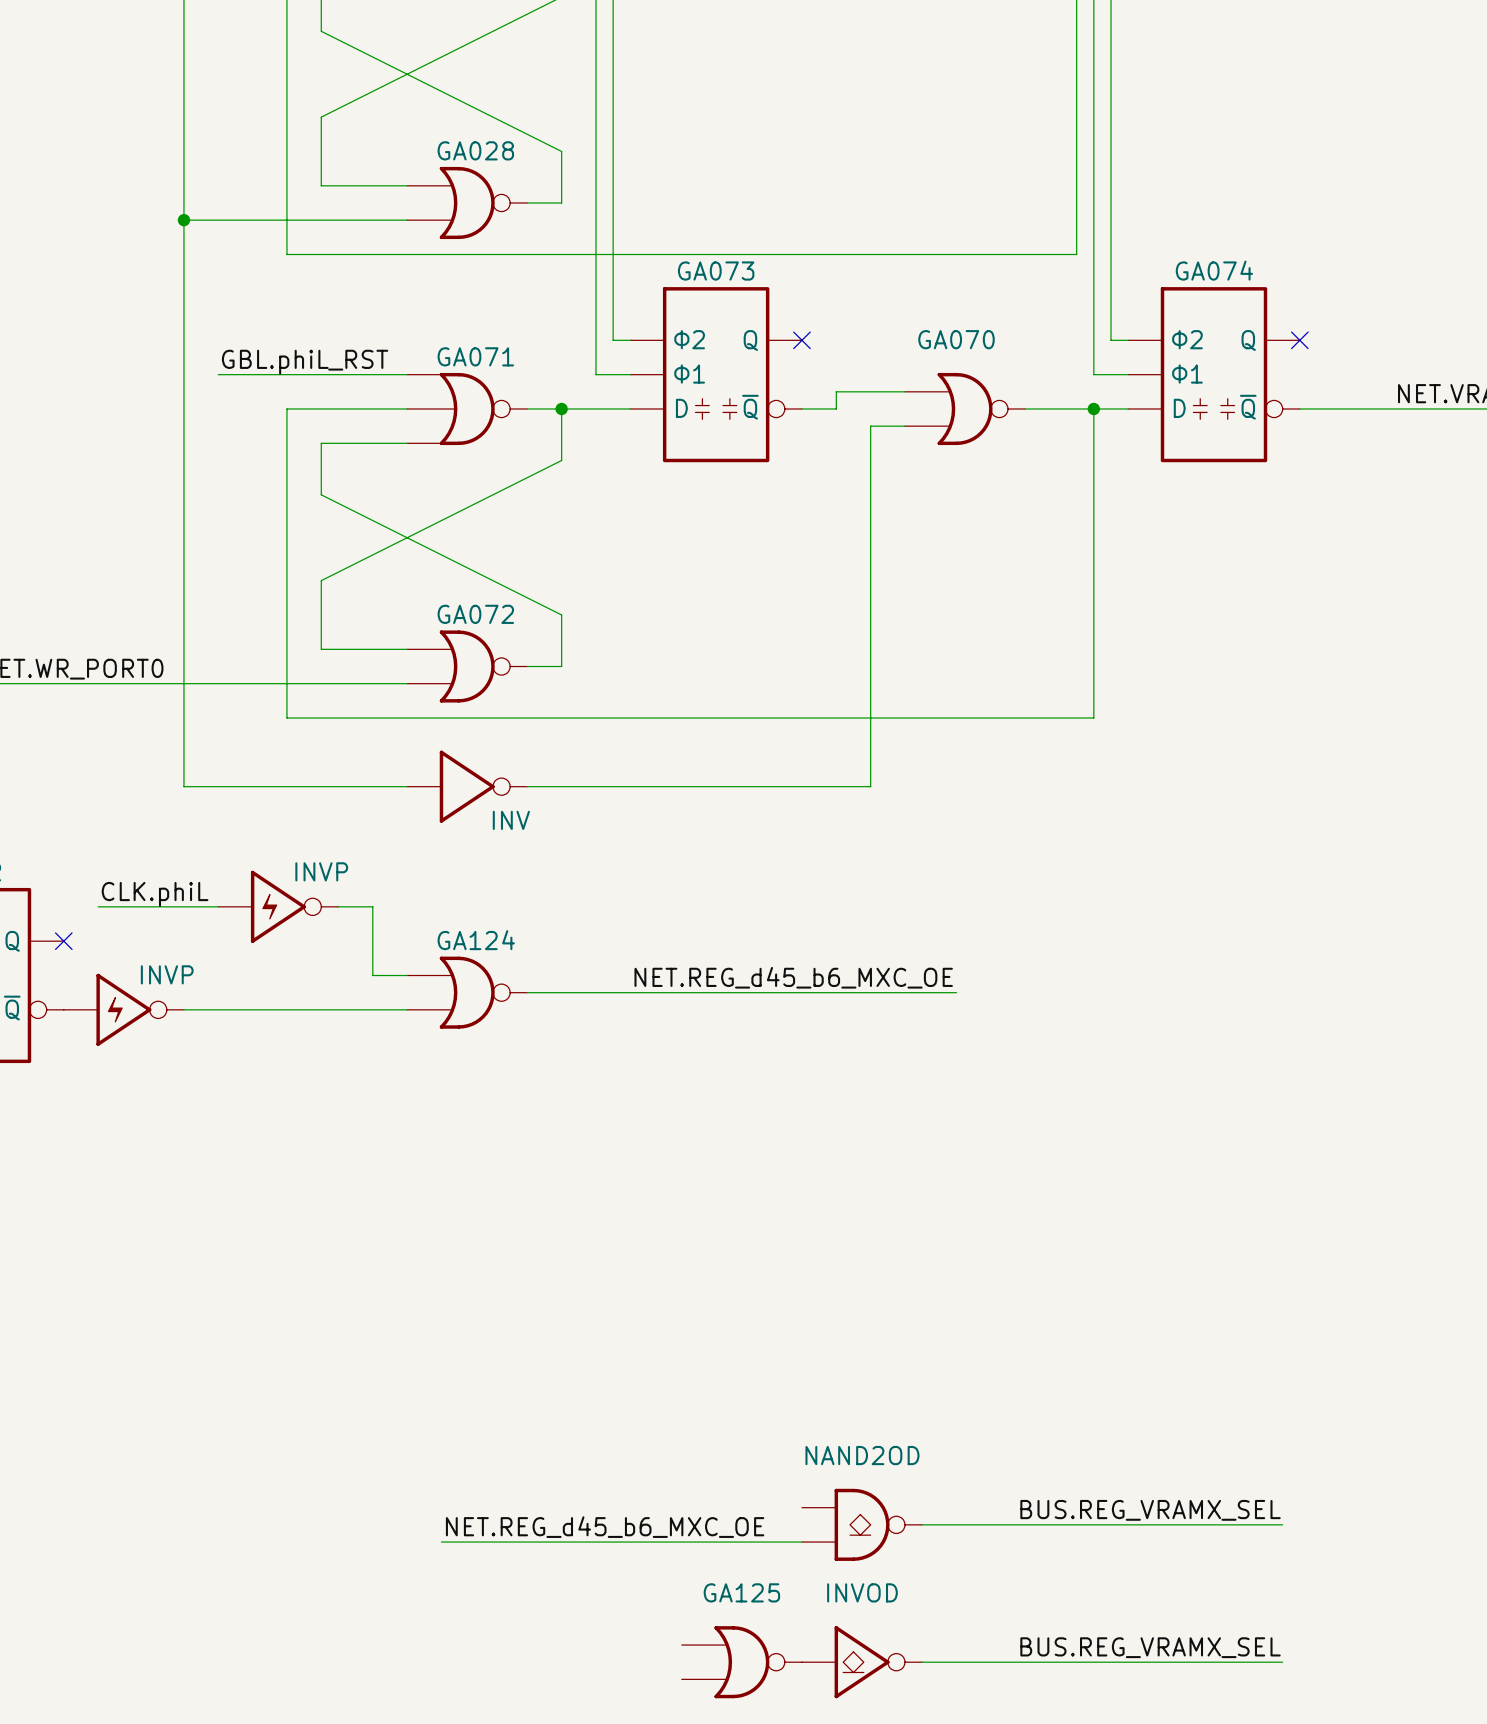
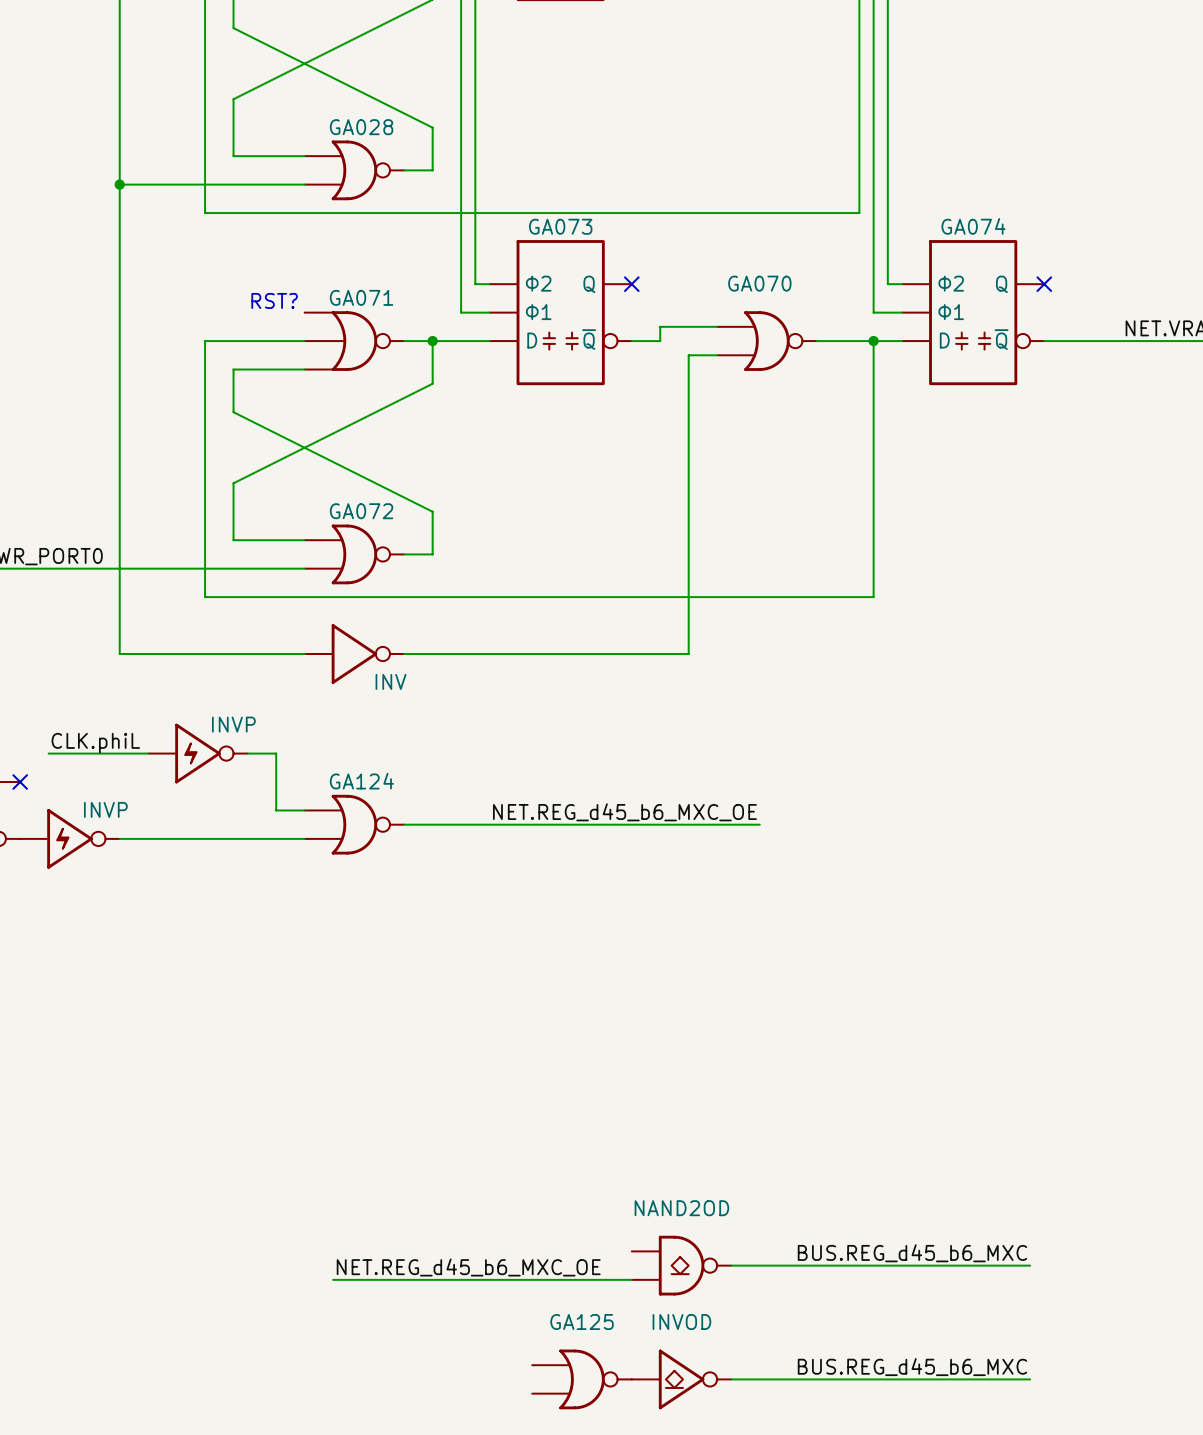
text: none -> RST? (274, 300)
label: GBL.phiL_RST (305, 362) -> none
wire: (218, 374) (407, 374) -> none
label: BUS.REG_VRAMX_SEL (1150, 1510) -> BUS.REG_d45_b6_MXC (912, 1253)
label: BUS.REG_VRAMX_SEL (1150, 1647) -> BUS.REG_d45_b6_MXC (912, 1367)

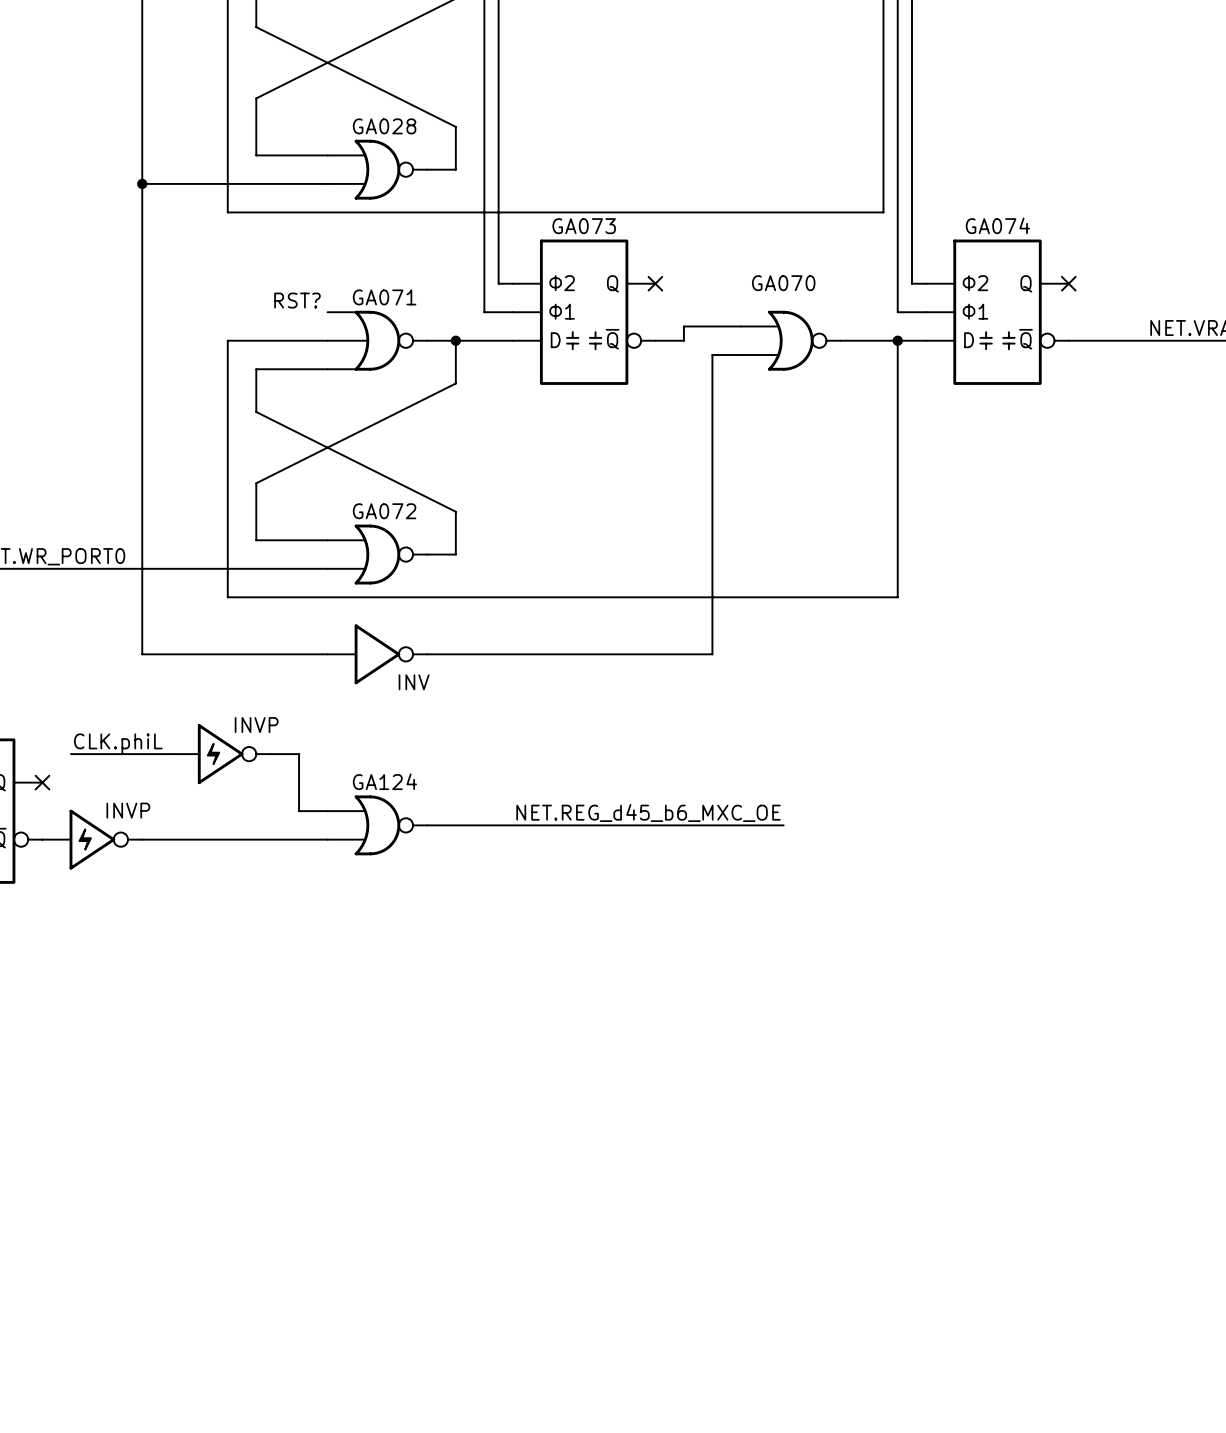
label: BUS.REG_d45_b6_MXC (912, 1253) -> none
part: NAND2OD (681, 1265) -> none
wire: (731, 1265) (1030, 1265) -> none
label: NET.REG_d45_b6_MXC_OE (468, 1267) -> none
wire: (333, 1279) (631, 1279) -> none
label: BUS.REG_d45_b6_MXC (912, 1367) -> none
part: GA125 (582, 1379) -> none
part: INVOD (681, 1379) -> none
wire: (731, 1379) (1030, 1379) -> none

